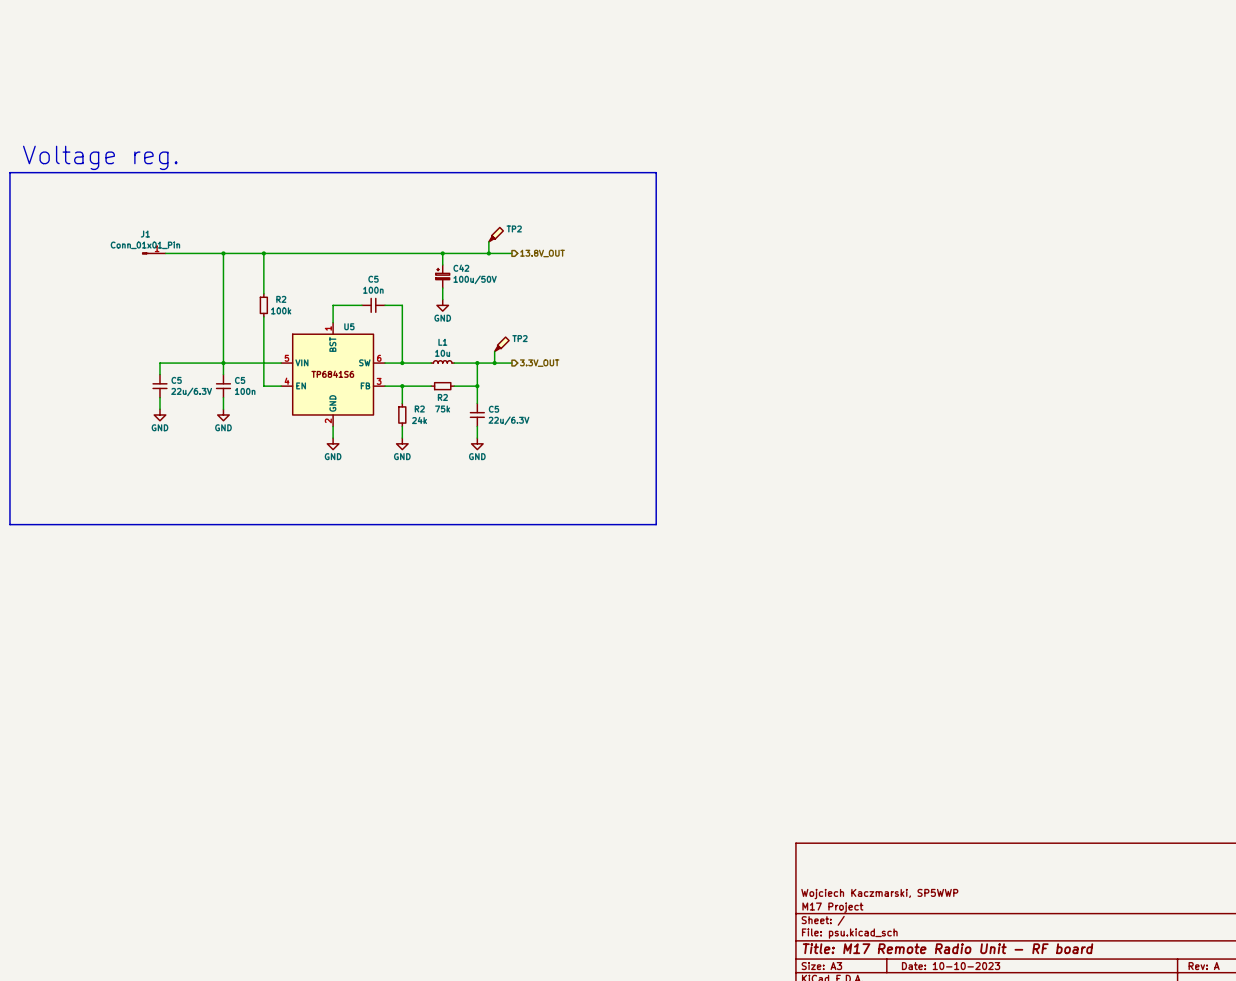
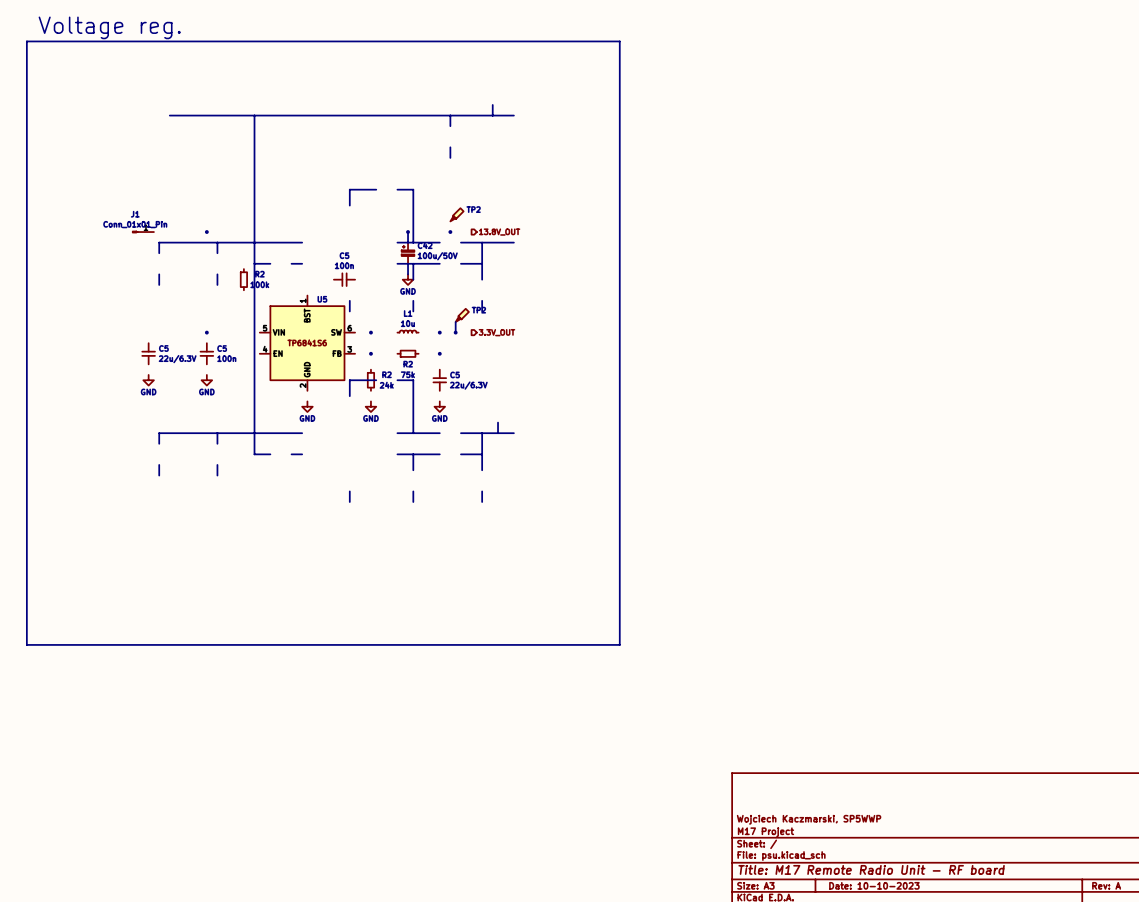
text: none -> Voltage reg. (109, 27)
wire: none -> (492, 104) (492, 115)
wire: none -> (169, 115) (513, 115)
wire: none -> (254, 115) (254, 454) (270, 454)
wire: none -> (450, 115) (450, 126)
text: Voltage reg. (100, 157) -> none
line: (9, 172) (656, 172) (656, 524) (9, 524) (9, 172) -> (26, 41) (26, 644) (619, 644) (619, 41) (26, 41)
wire: (488, 241) (488, 253) -> (450, 147) (450, 157)
wire: (165, 253) (511, 253) -> none
wire: (223, 253) (223, 374) -> none
wire: (263, 253) (263, 293) -> none
junction: (263, 253) -> none
wire: none -> (217, 242) (217, 253)
wire: none -> (302, 242) (159, 242) (159, 253)
wire: none -> (254, 263) (270, 263)
wire: none -> (291, 263) (302, 263)
wire: (361, 305) (333, 305) (333, 322) -> (376, 189) (349, 189) (349, 205)
wire: (385, 305) (402, 305) (402, 363) -> (397, 189) (413, 189) (413, 242)
wire: (263, 316) (263, 386) (281, 386) -> none
wire: (281, 363) (159, 363) (159, 374) -> none
wire: (385, 363) (431, 363) -> (397, 242) (439, 242)
wire: (454, 363) (511, 363) -> (460, 242) (513, 242)
wire: (477, 363) (477, 403) -> (482, 242) (482, 279)
wire: (385, 386) (431, 386) -> (397, 263) (439, 263)
wire: (402, 386) (402, 403) -> (413, 263) (413, 279)
wire: (454, 386) (477, 386) -> (460, 263) (482, 263)
wire: (159, 397) (159, 409) -> (159, 274) (159, 284)
wire: (223, 397) (223, 409) -> (217, 274) (217, 284)
wire: none -> (376, 380) (349, 380) (349, 396)
wire: none -> (397, 380) (413, 380) (413, 433)
wire: (333, 426) (333, 438) -> (349, 300) (349, 311)
wire: (402, 426) (402, 438) -> (413, 300) (413, 311)
wire: (477, 426) (477, 438) -> (482, 300) (482, 311)
wire: none -> (498, 422) (498, 433)
wire: none -> (217, 433) (217, 443)
wire: none -> (302, 433) (159, 433) (159, 443)
wire: none -> (397, 433) (439, 433)
wire: none -> (460, 433) (513, 433)
wire: none -> (482, 433) (482, 470)
wire: none -> (291, 454) (302, 454)
wire: none -> (397, 454) (439, 454)
wire: none -> (413, 454) (413, 470)
wire: none -> (460, 454) (482, 454)
wire: none -> (159, 464) (159, 475)
wire: none -> (217, 464) (217, 475)
wire: none -> (349, 491) (349, 502)
wire: none -> (413, 491) (413, 502)
wire: none -> (482, 491) (482, 502)

